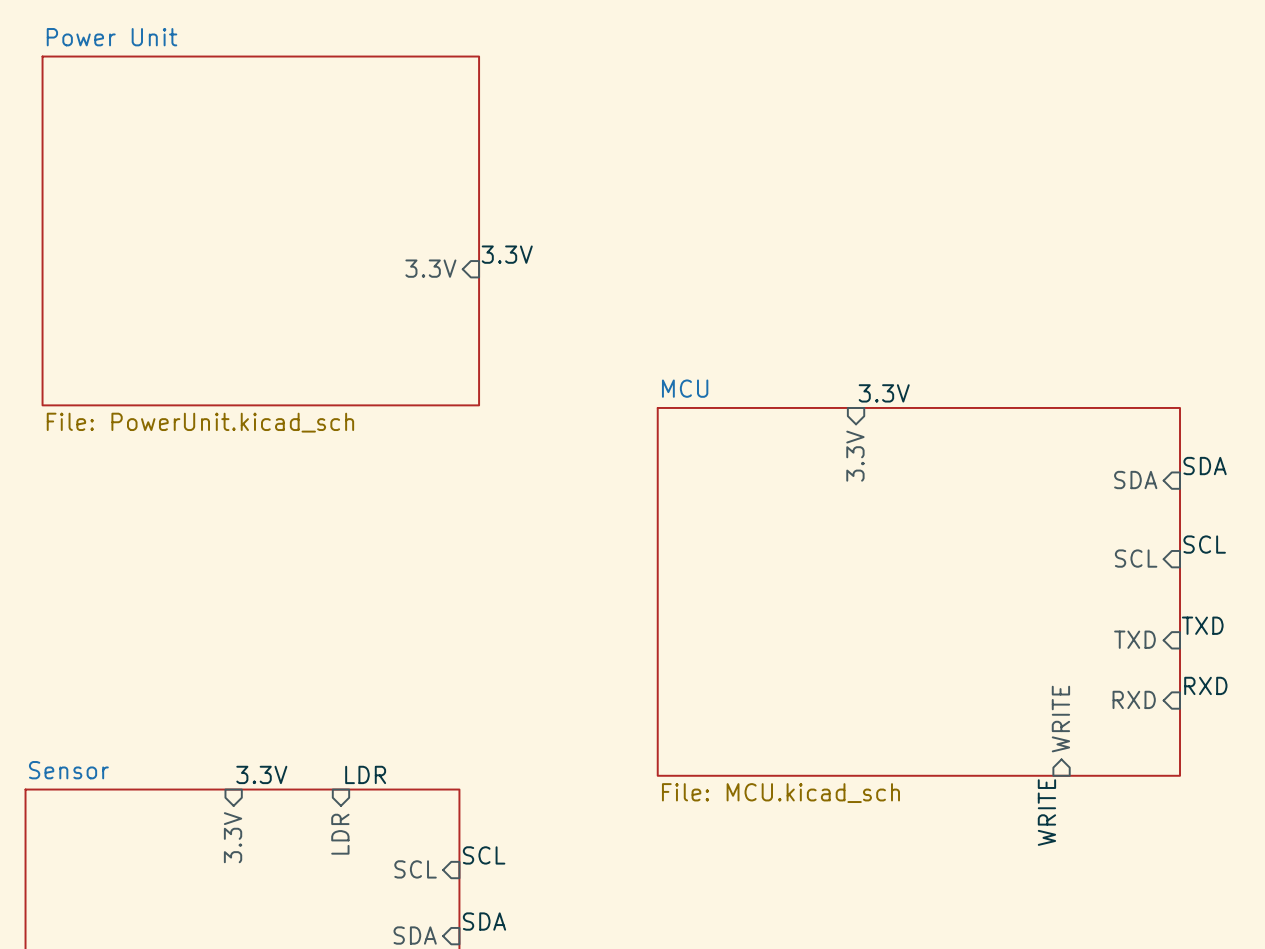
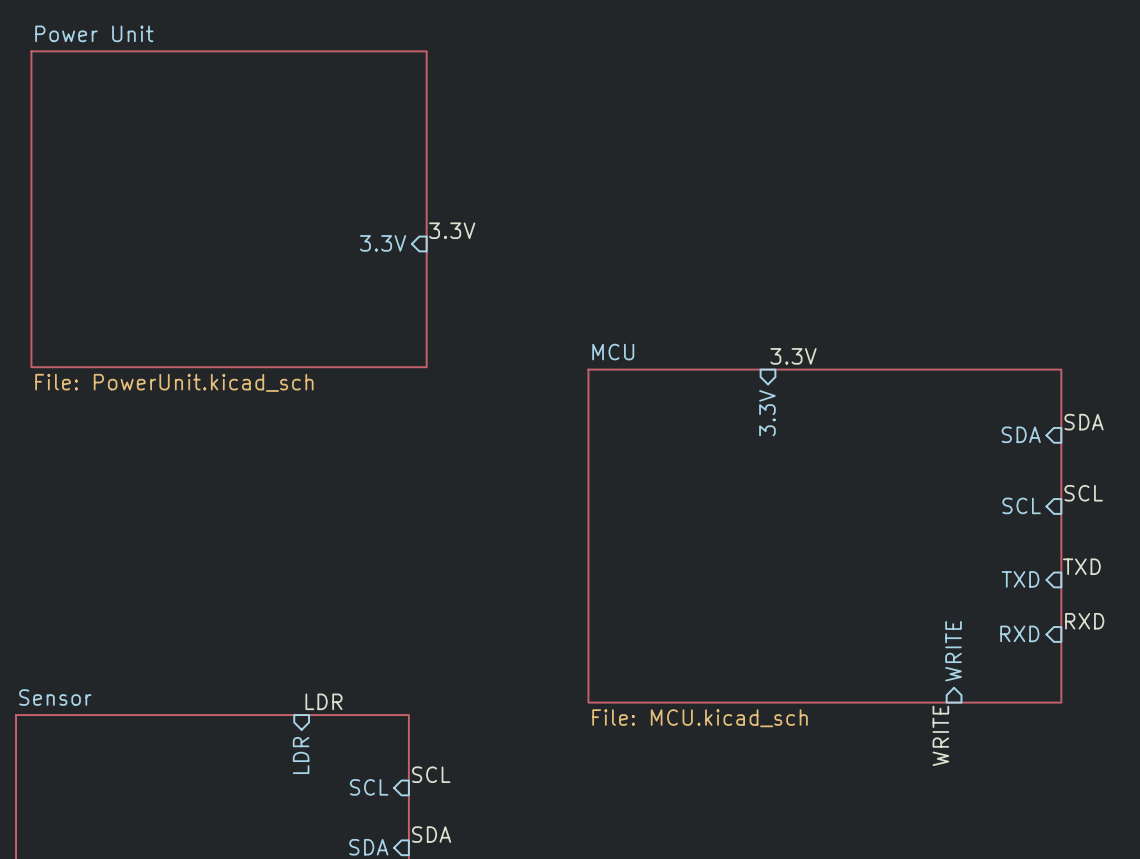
label: 3.3V (261, 774) -> none
sheet pin: 3.3V (233, 837) -> none

